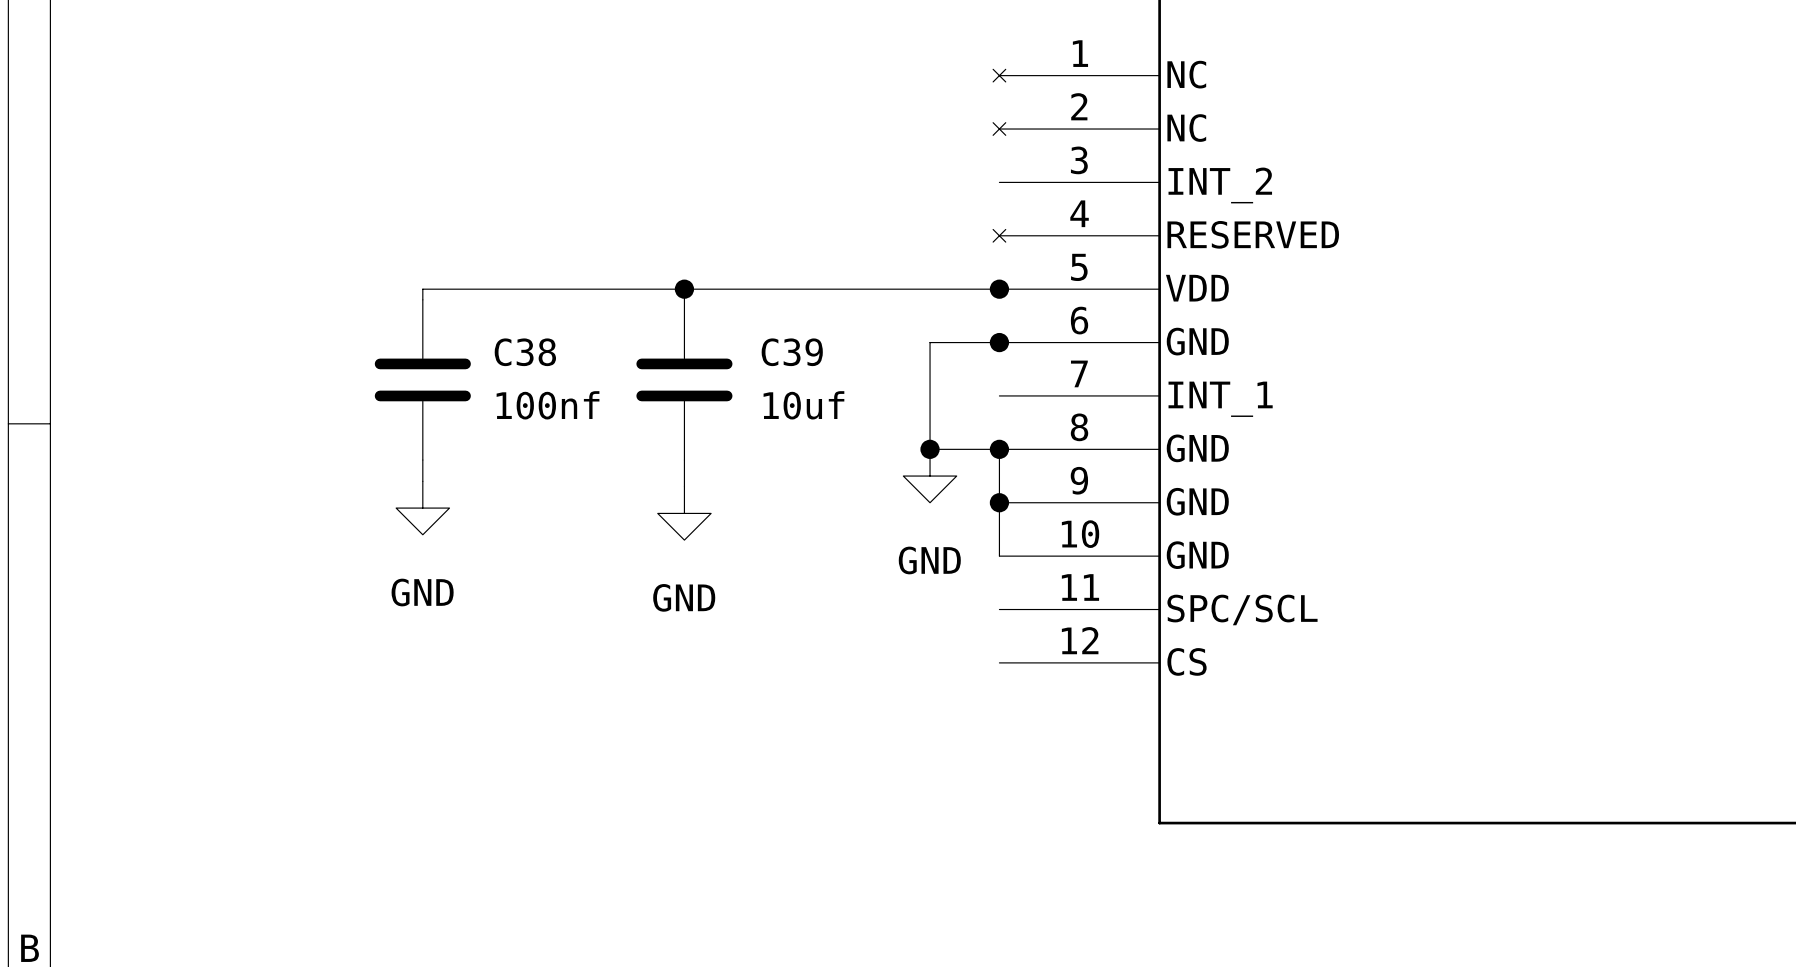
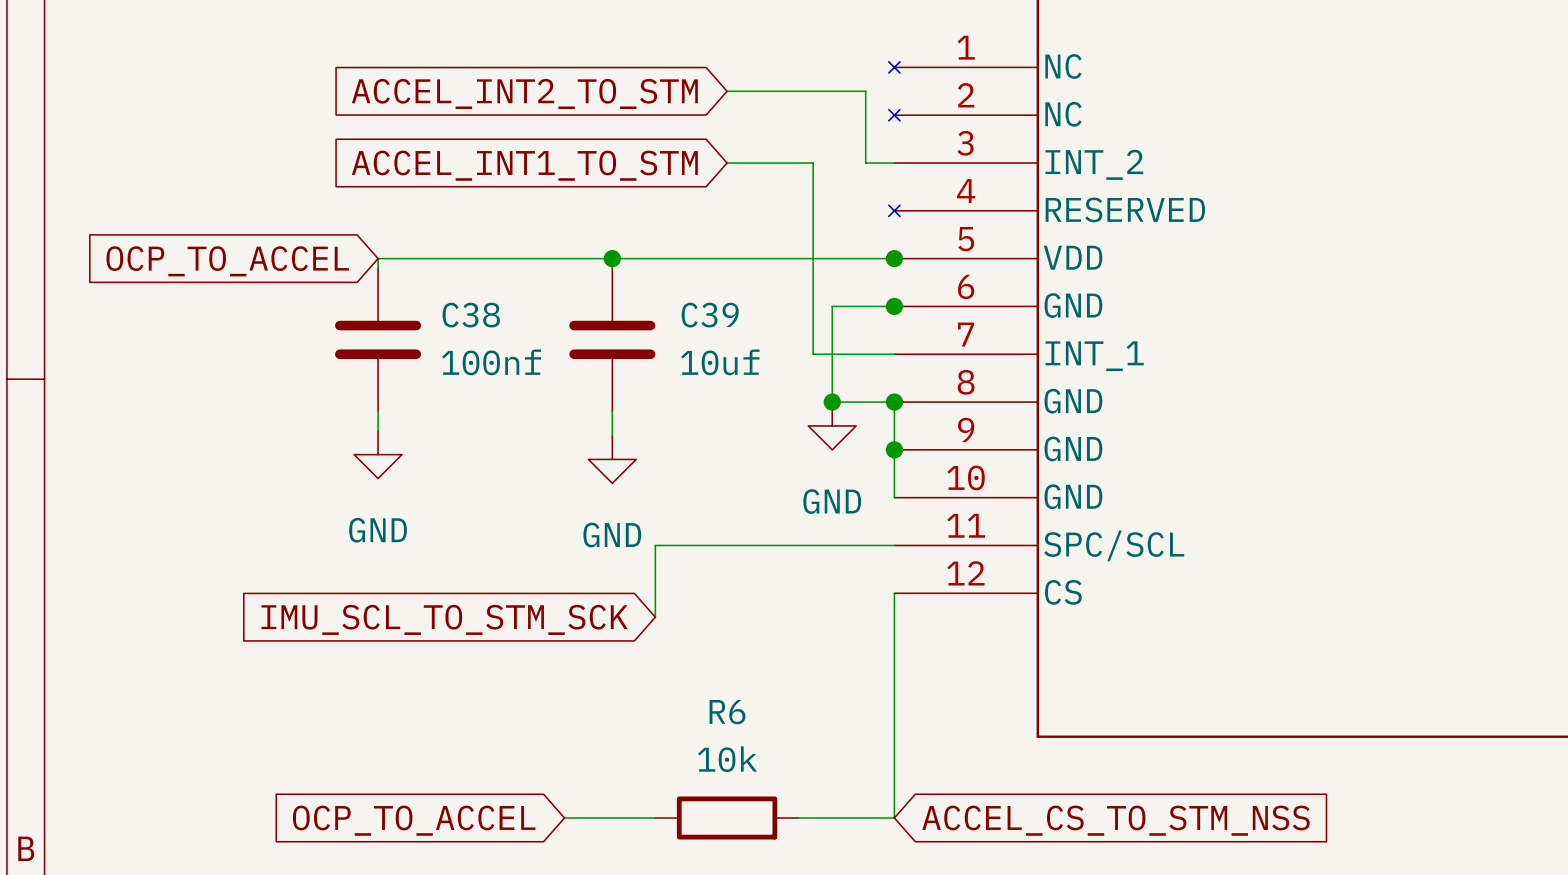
wire: none -> (727, 91) (865, 91) (865, 163) (894, 163)
global label: none -> ACCEL_INT2_TO_STM (524, 93)
wire: none -> (727, 163) (813, 163) (813, 354) (894, 354)
global label: none -> ACCEL_INT1_TO_STM (524, 165)
global label: none -> OCP_TO_ACCEL (227, 261)
wire: none -> (894, 545) (655, 545) (655, 617)
wire: none -> (894, 593) (894, 817) (798, 817)
global label: none -> IMU_SCL_TO_STM_SCK (444, 619)
wire: none -> (564, 817) (655, 817)
R6: none -> 10k (727, 817)
global label: none -> OCP_TO_ACCEL (414, 820)
global label: none -> ACCEL_CS_TO_STM_NSS (1116, 820)

